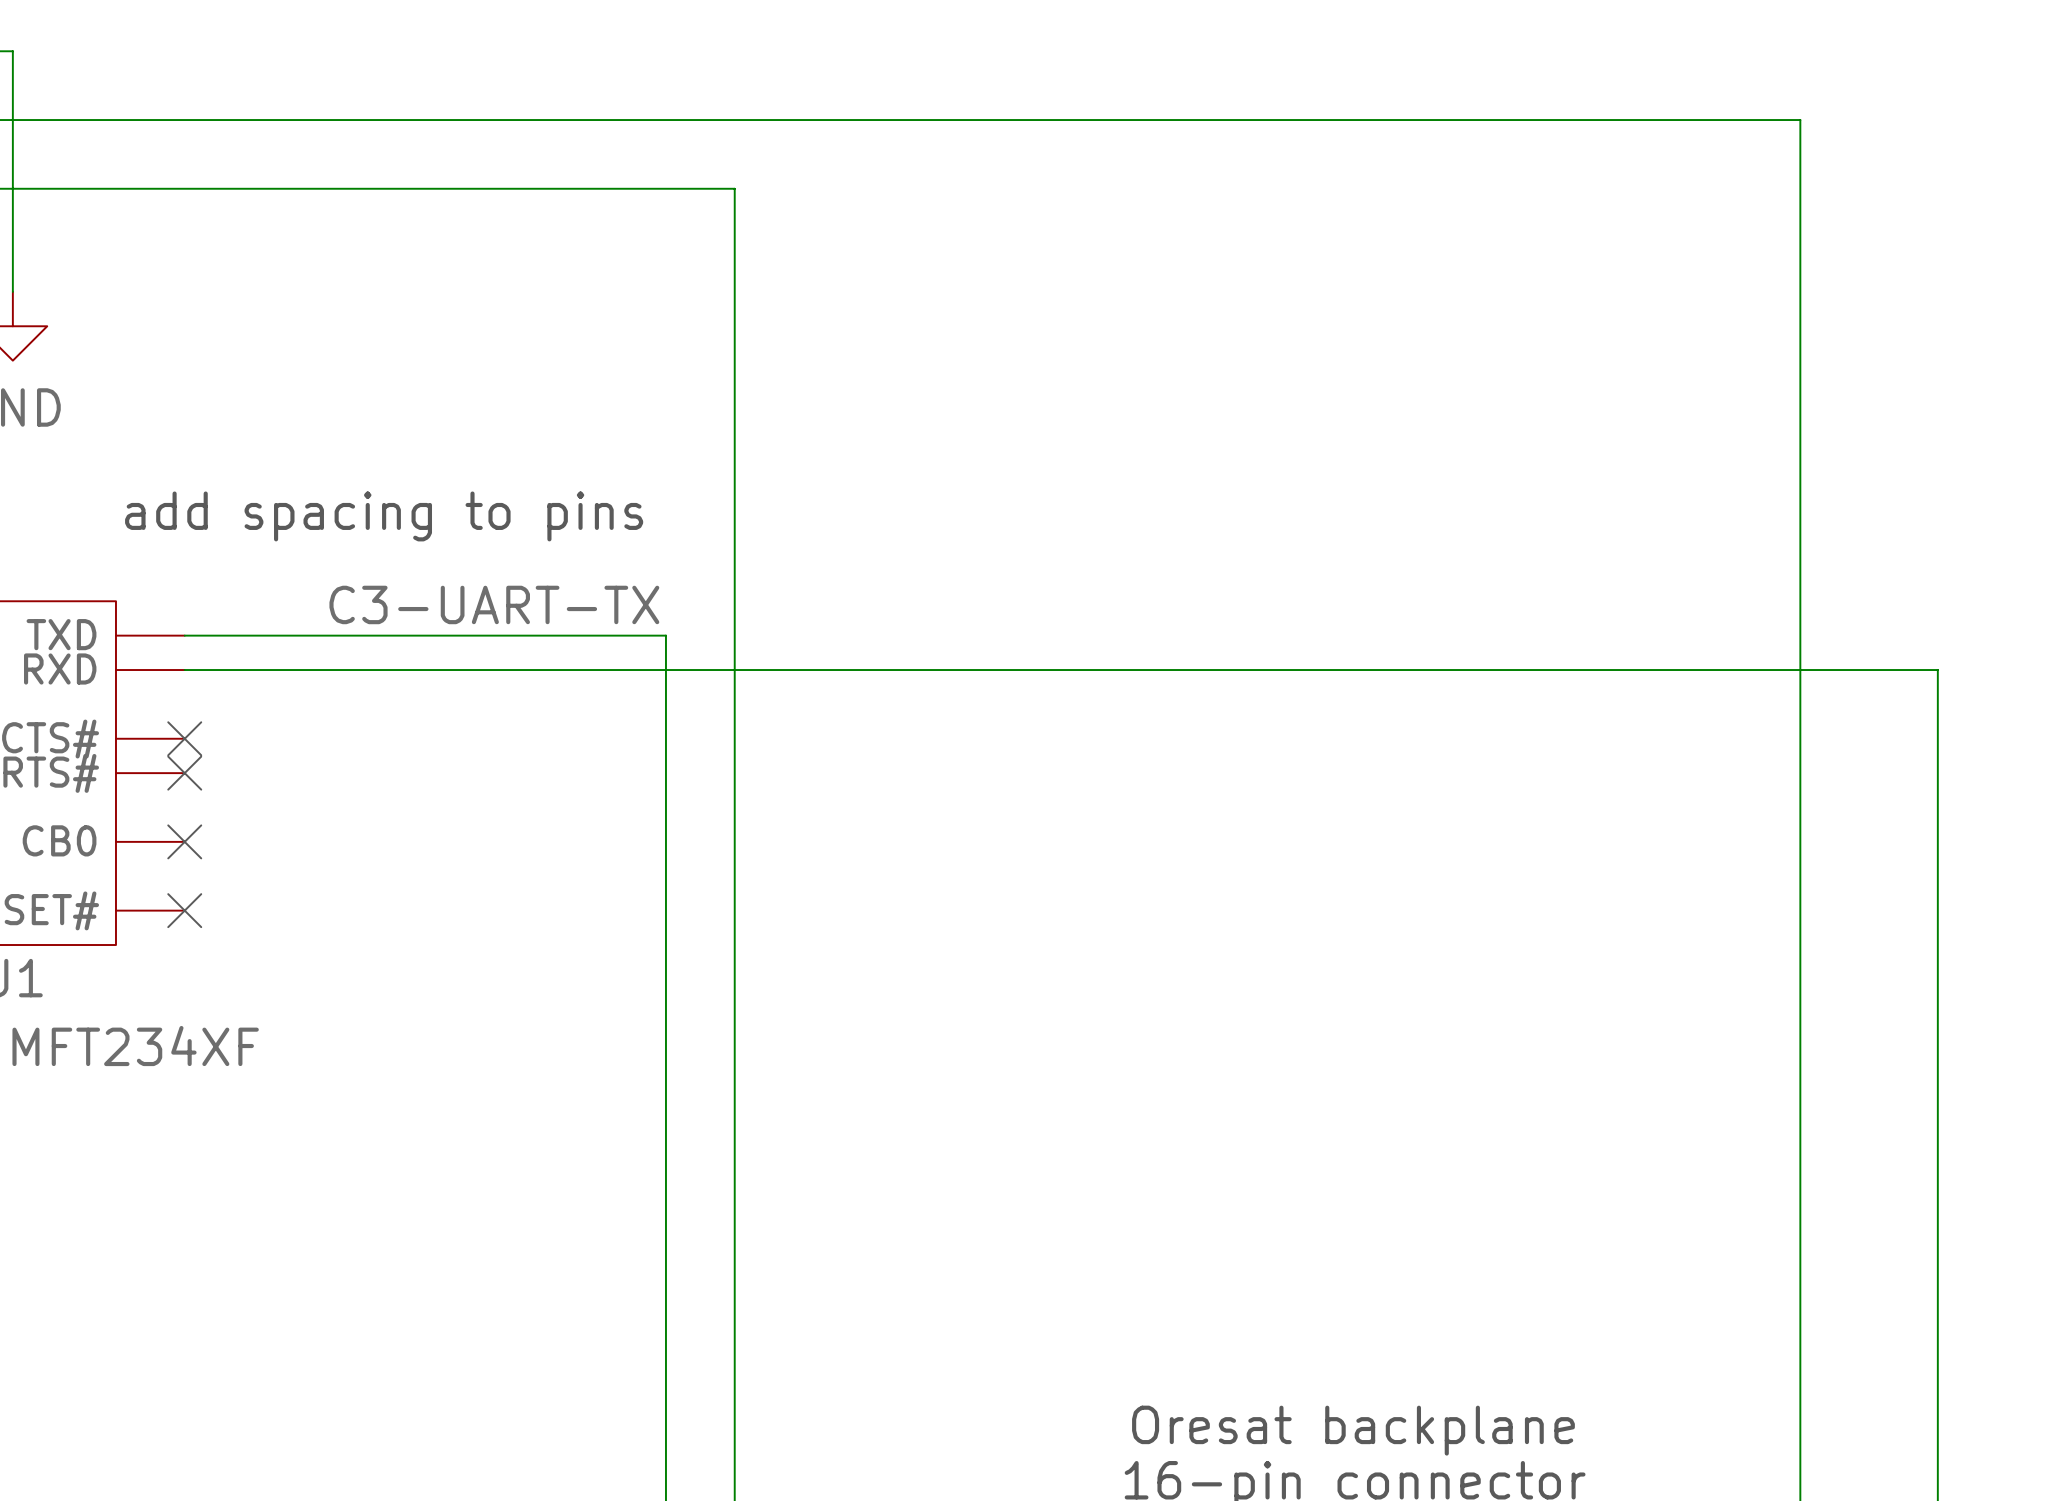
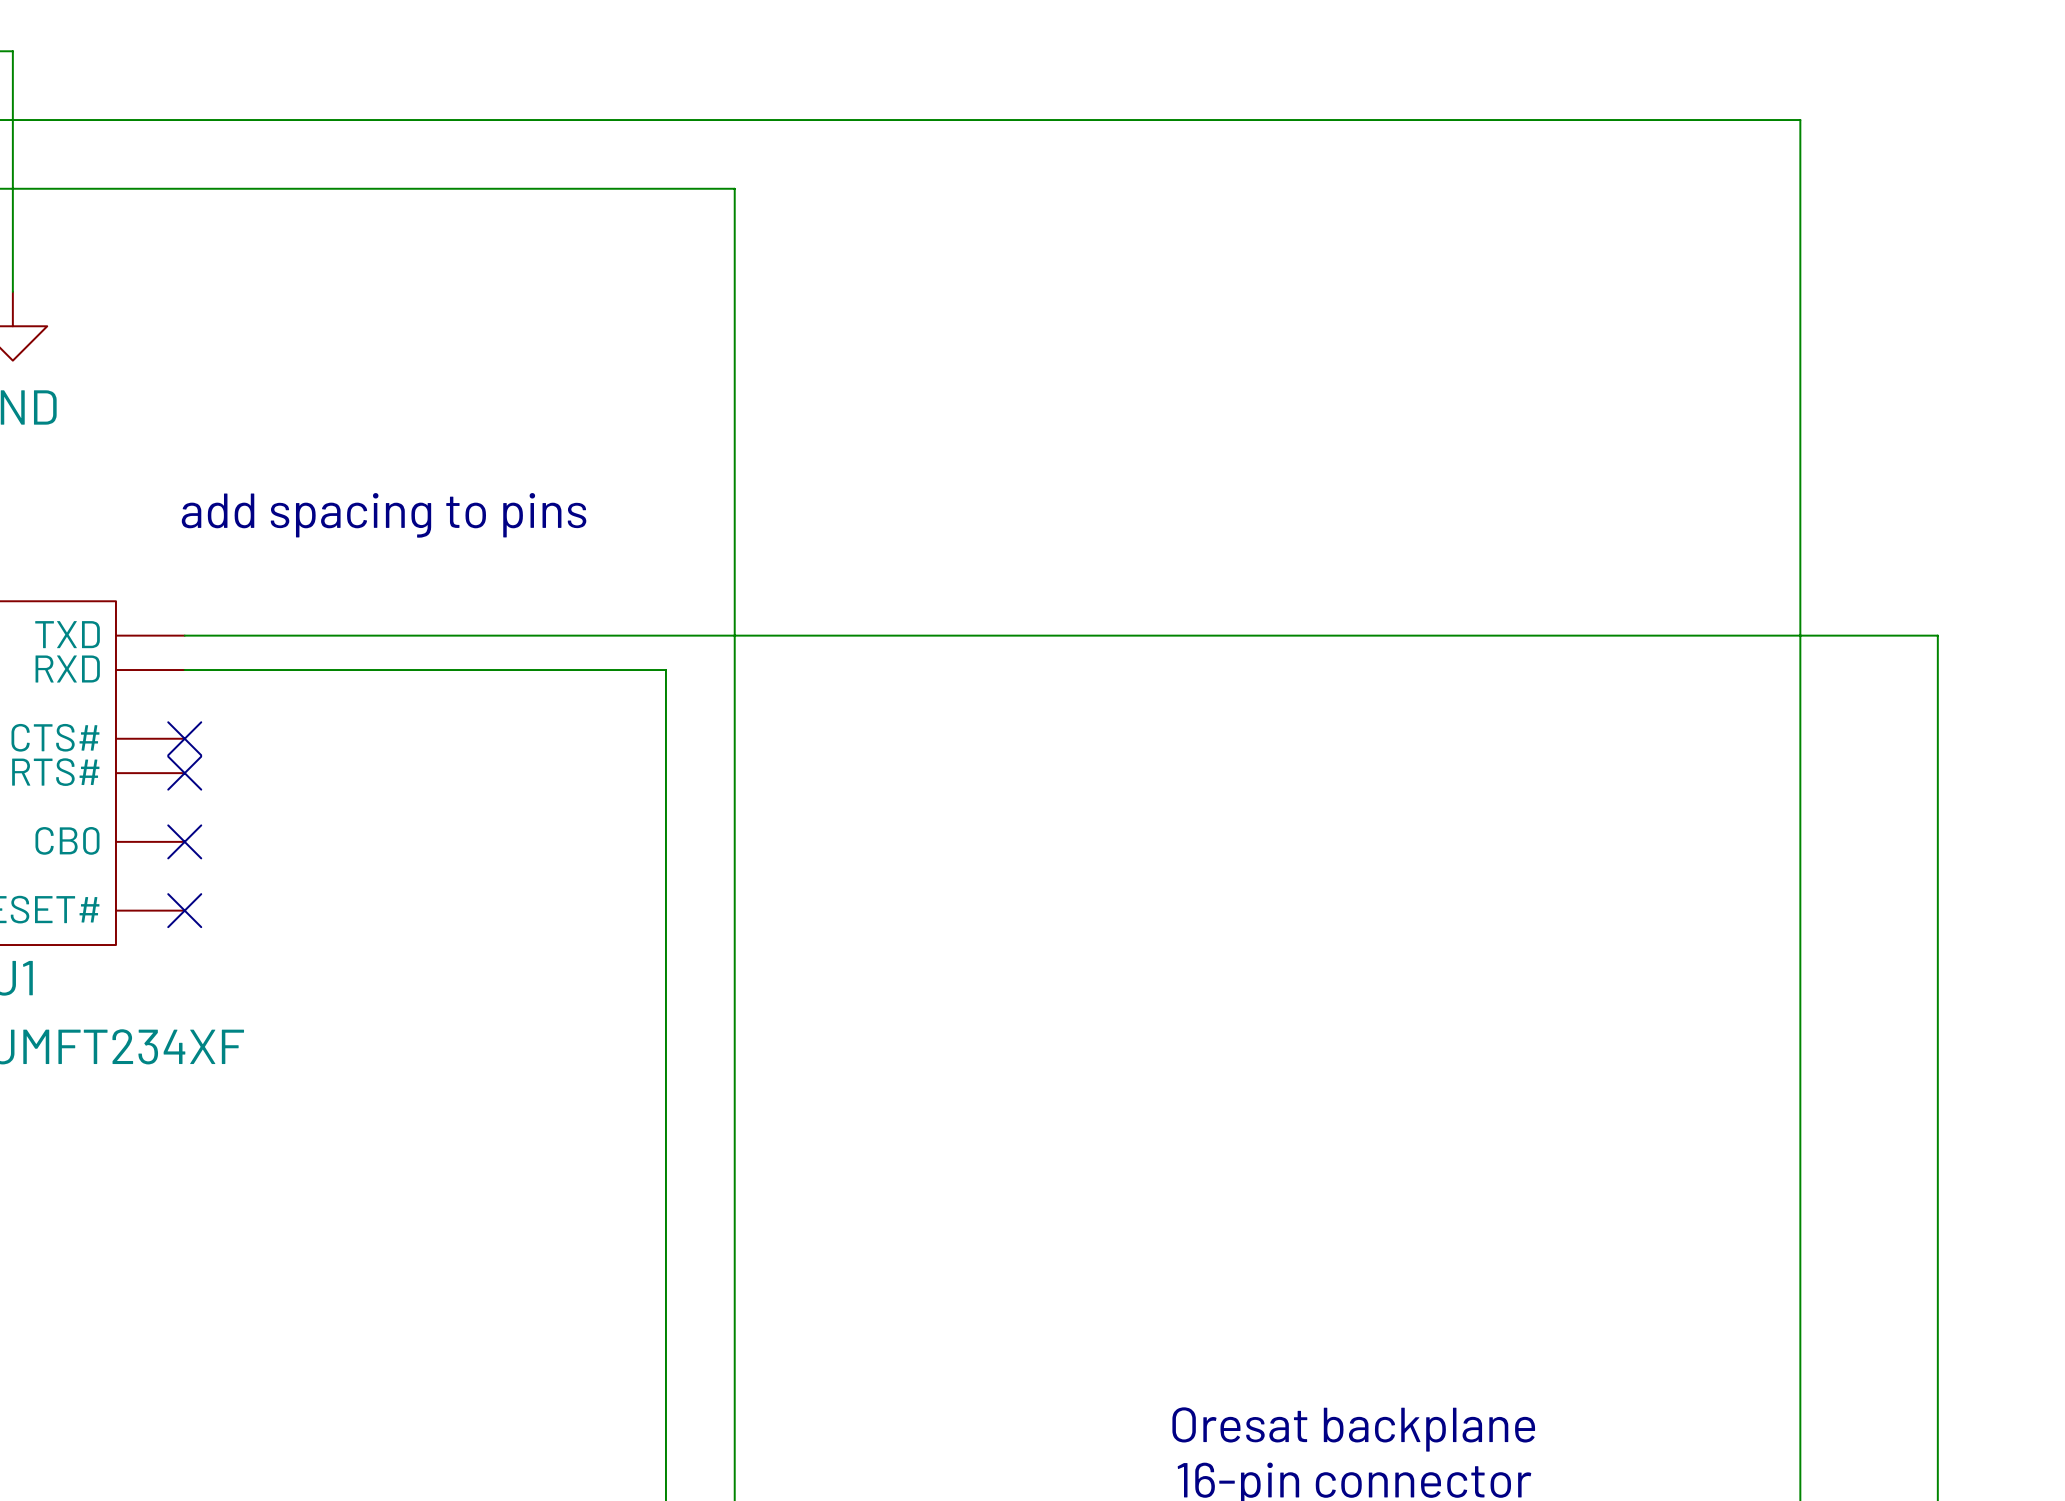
label: C3-UART-TX (494, 604) -> none
wire: (665, 635) (665, 670) (1937, 670) -> (665, 635) (1937, 635) (1937, 670)

